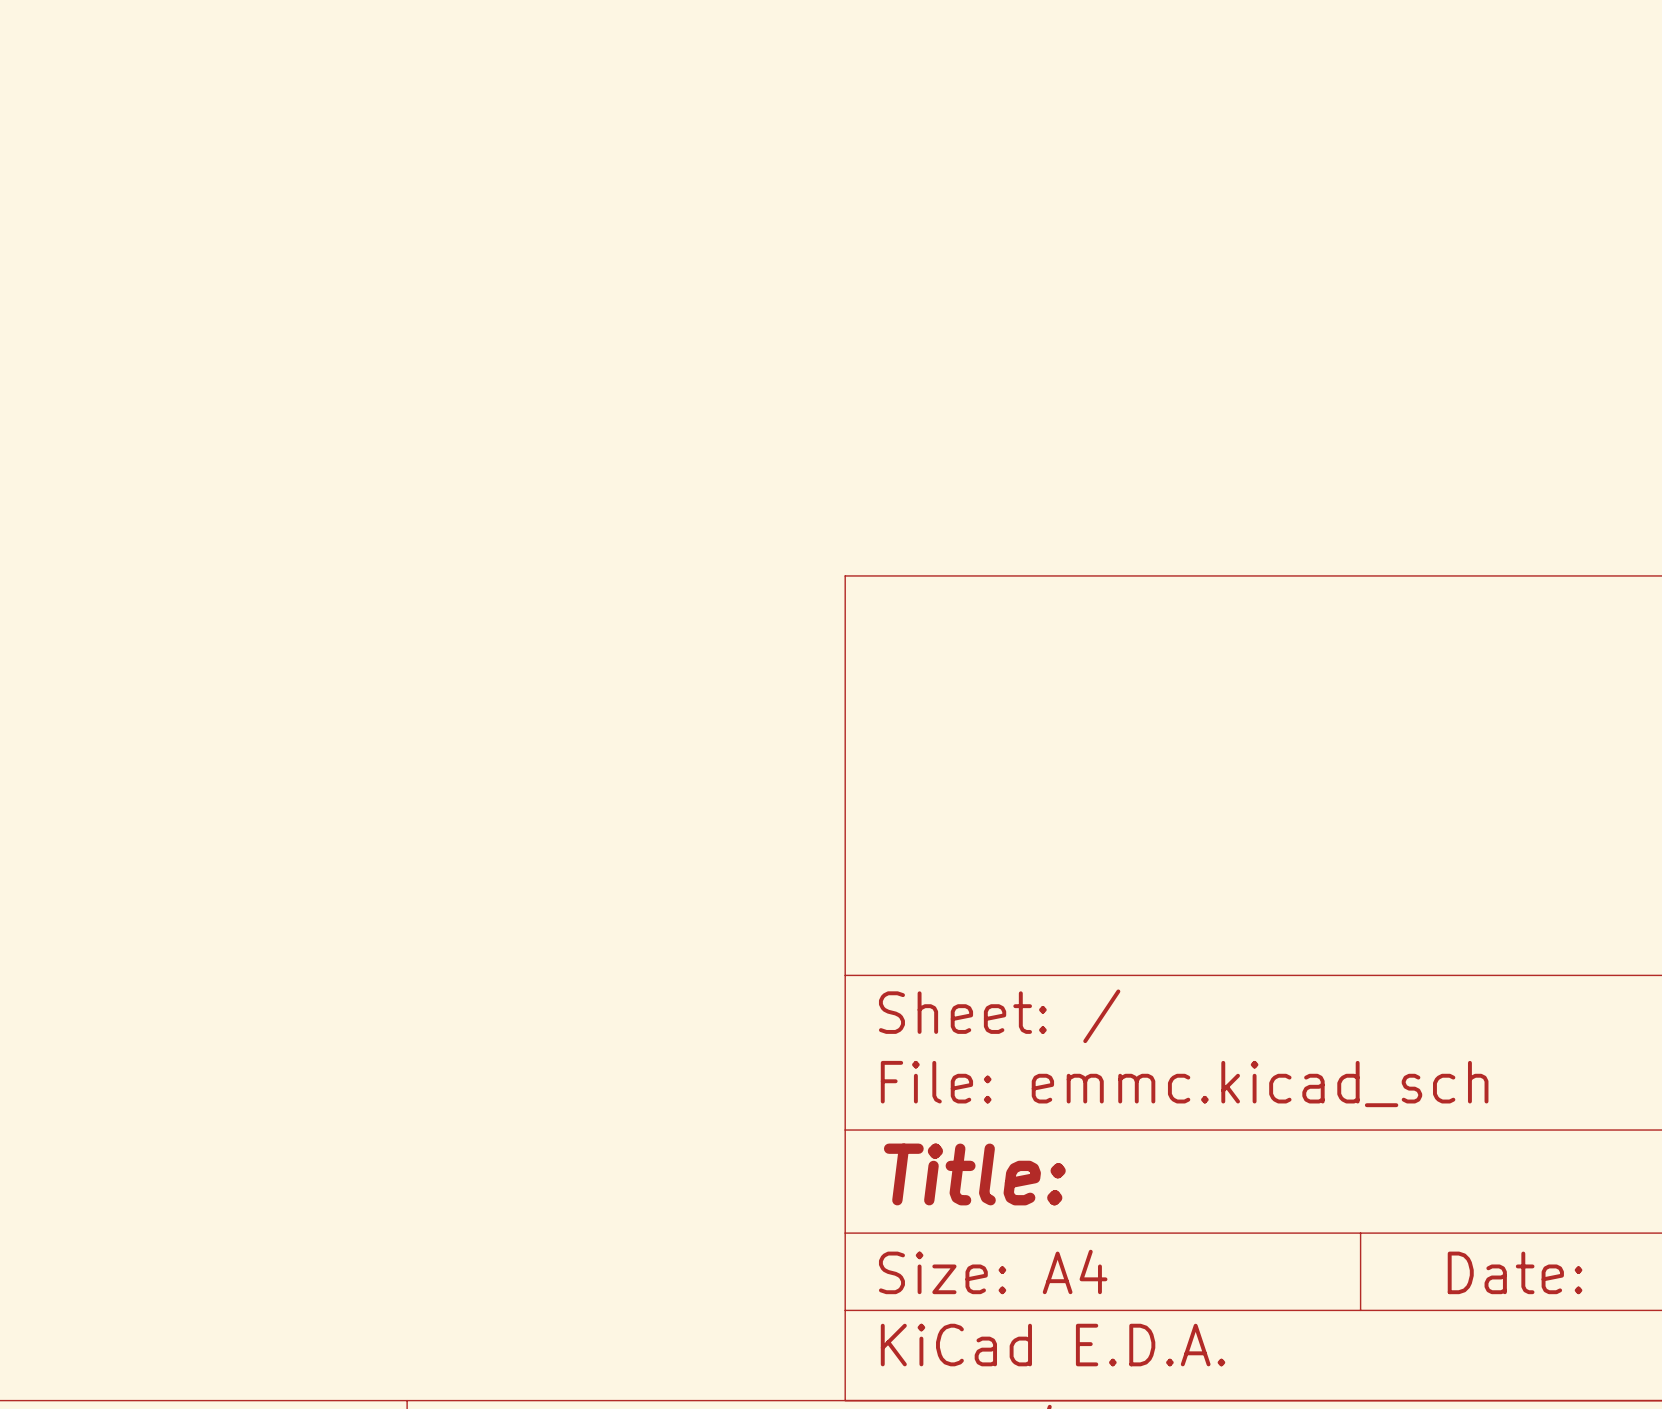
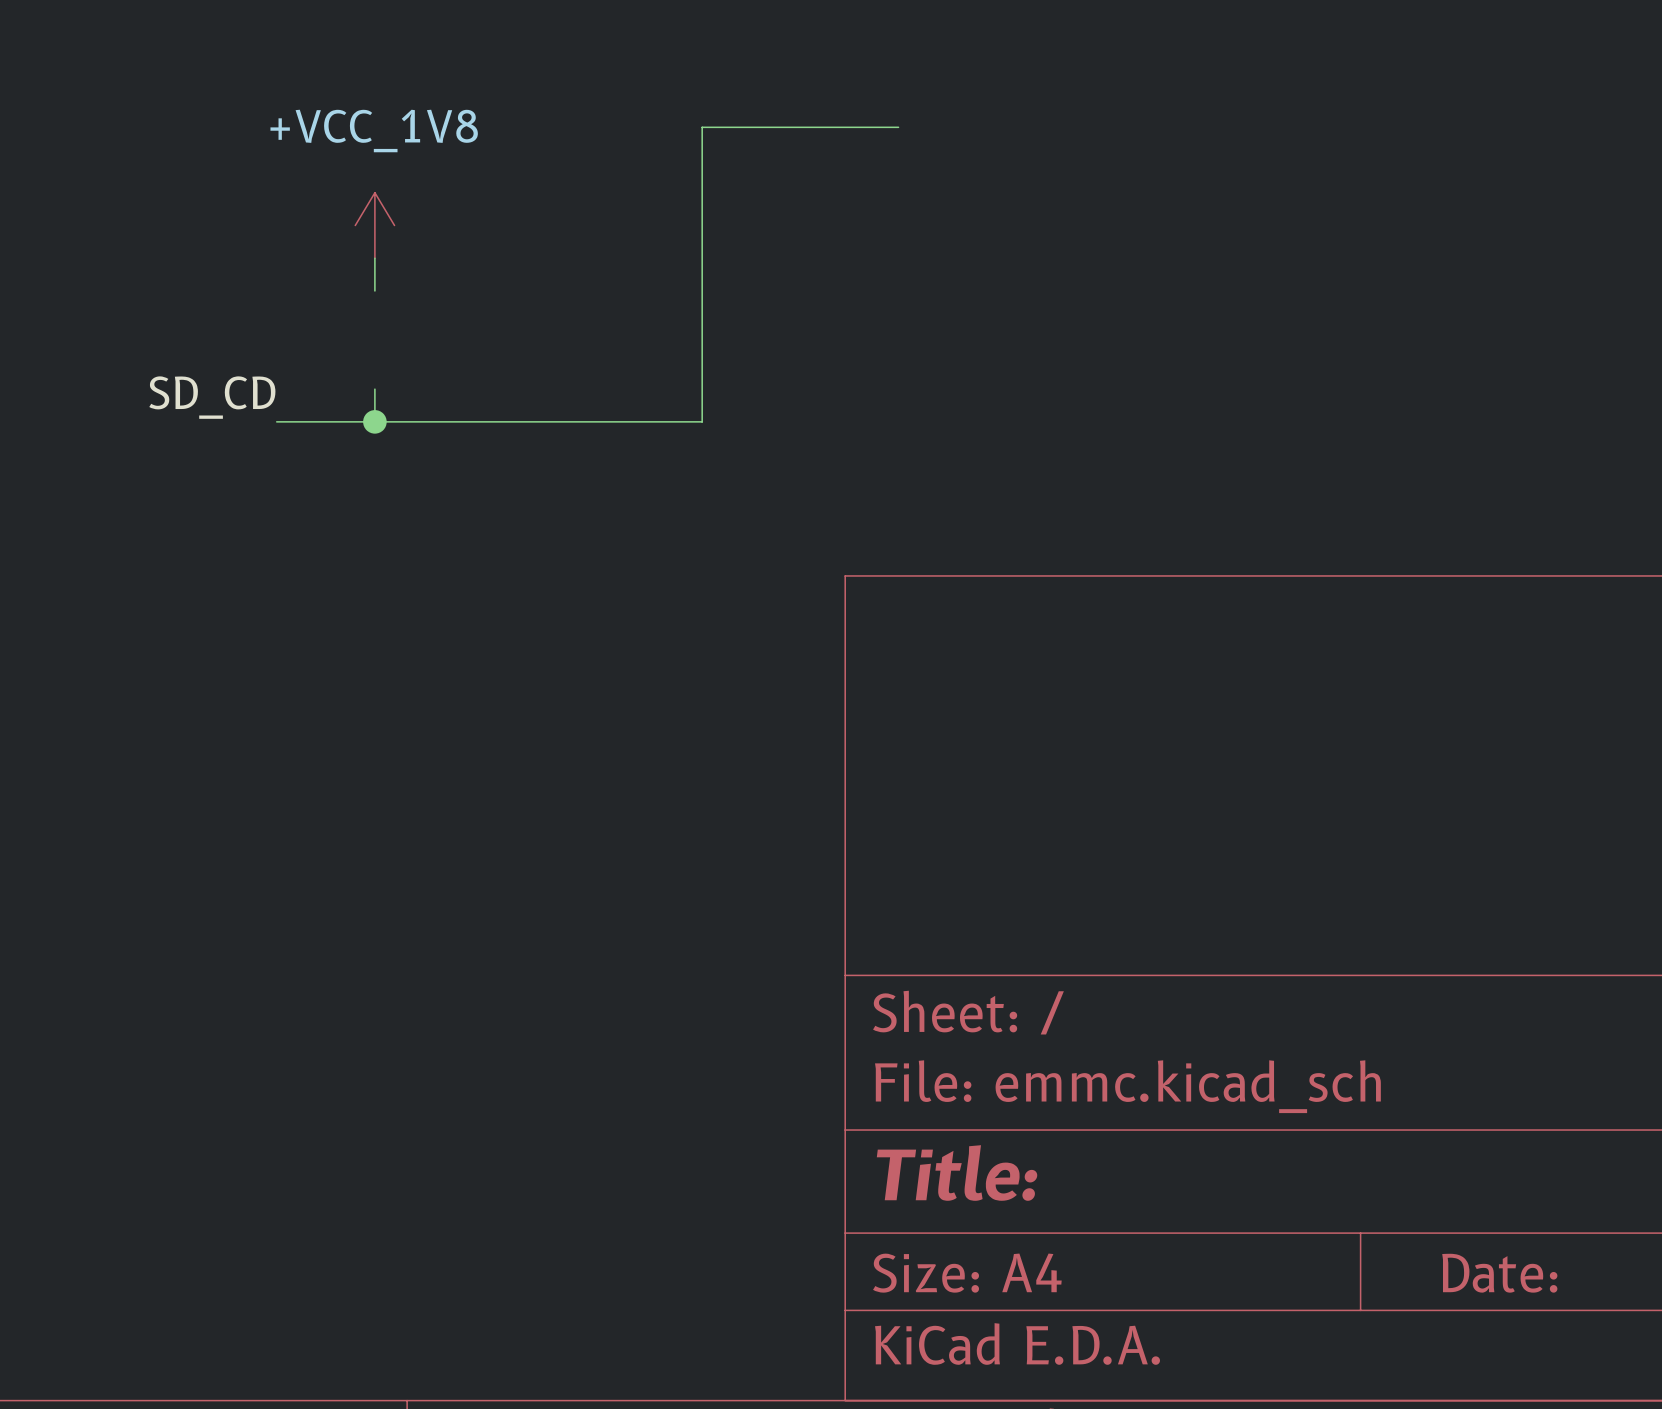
wire: none -> (898, 127) (702, 127) (702, 421) (276, 421)
power symbol: none -> +VCC_1V8 (374, 225)
wire: none -> (374, 258) (374, 290)
wire: none -> (374, 389) (374, 421)
label: none -> SD_CD (212, 397)
junction: none -> (374, 421)

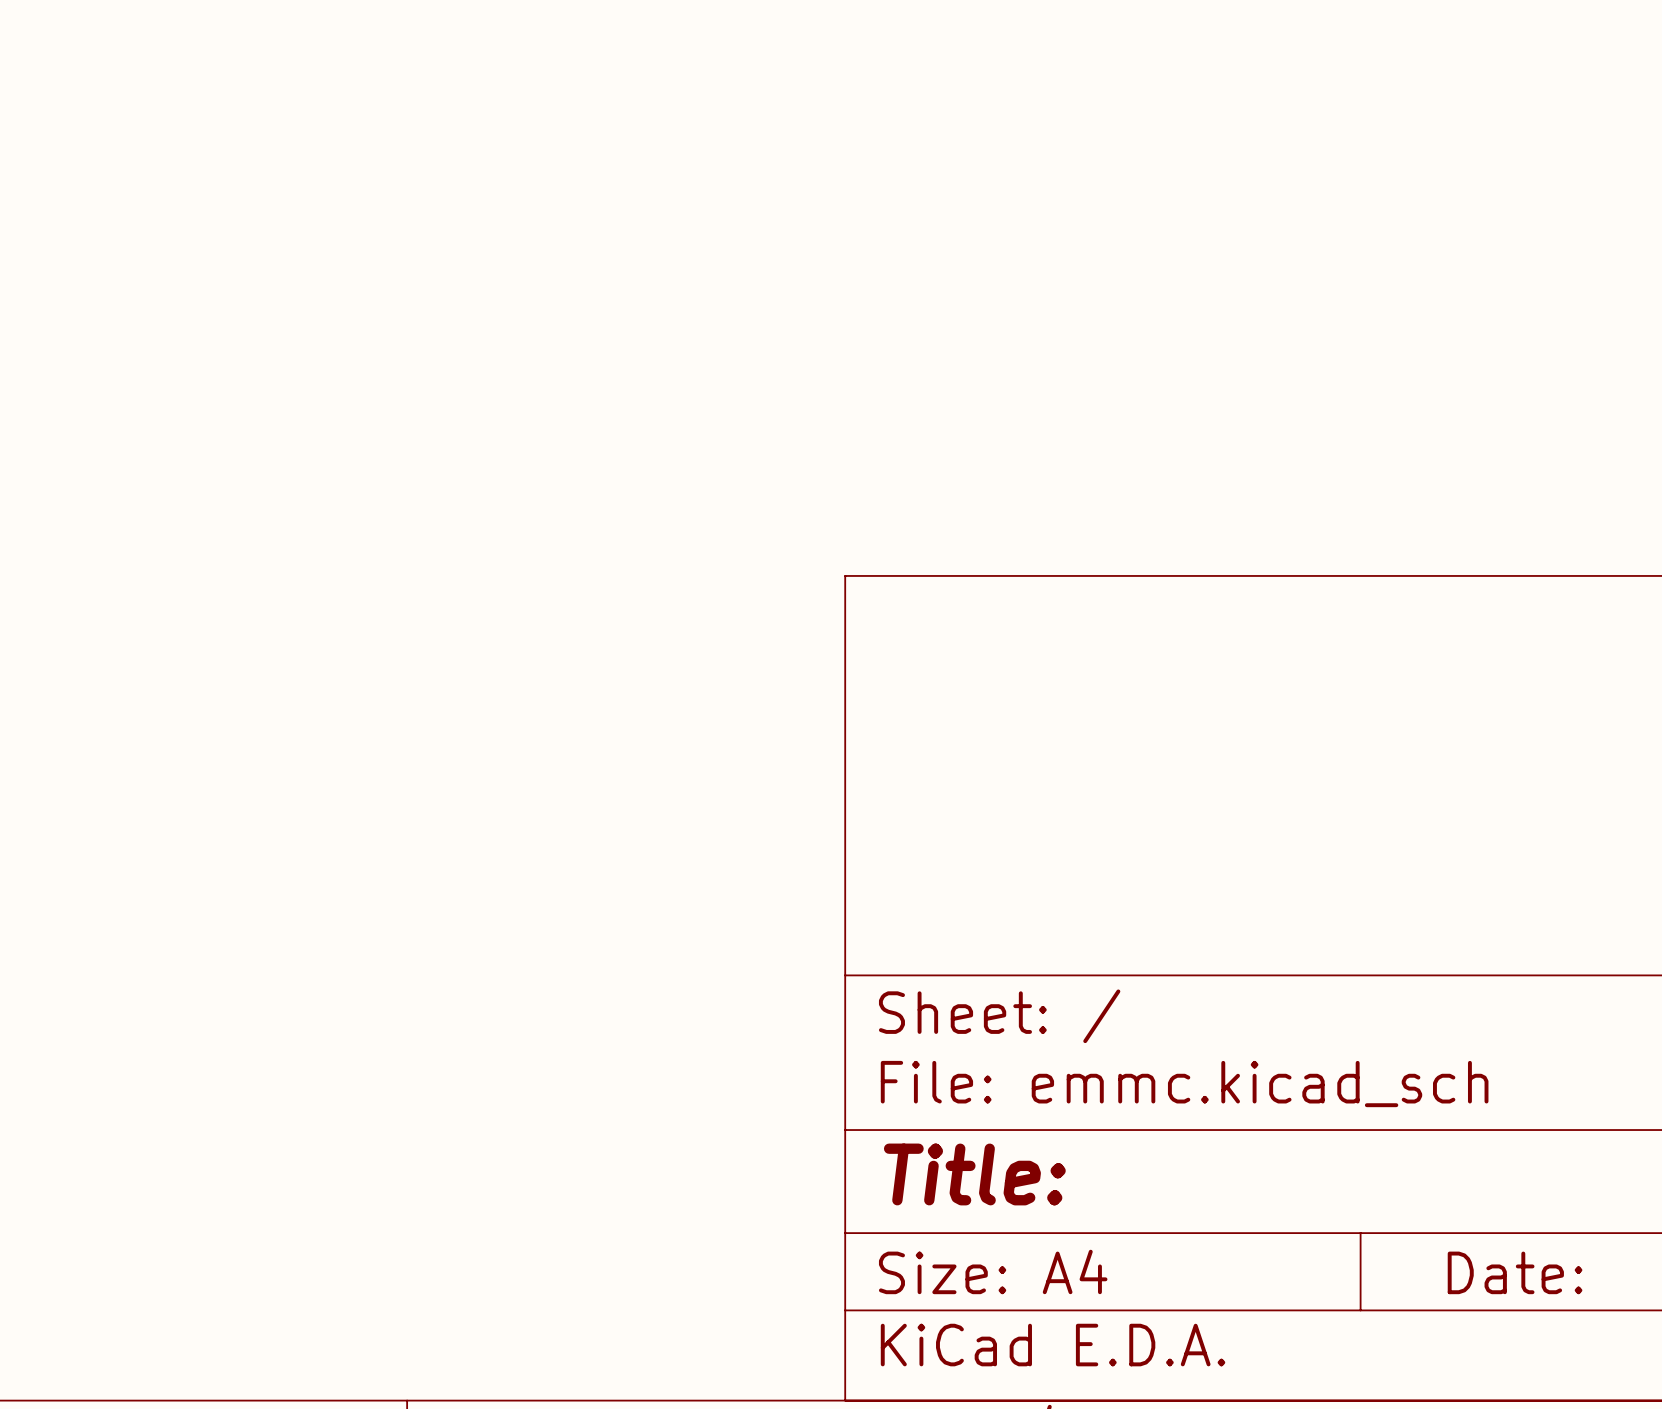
wire: (898, 127) (702, 127) (702, 421) (276, 421) -> none
power symbol: +VCC_1V8 (374, 225) -> none
wire: (374, 258) (374, 290) -> none
wire: (374, 389) (374, 421) -> none
label: SD_CD (212, 397) -> none
junction: (374, 421) -> none

